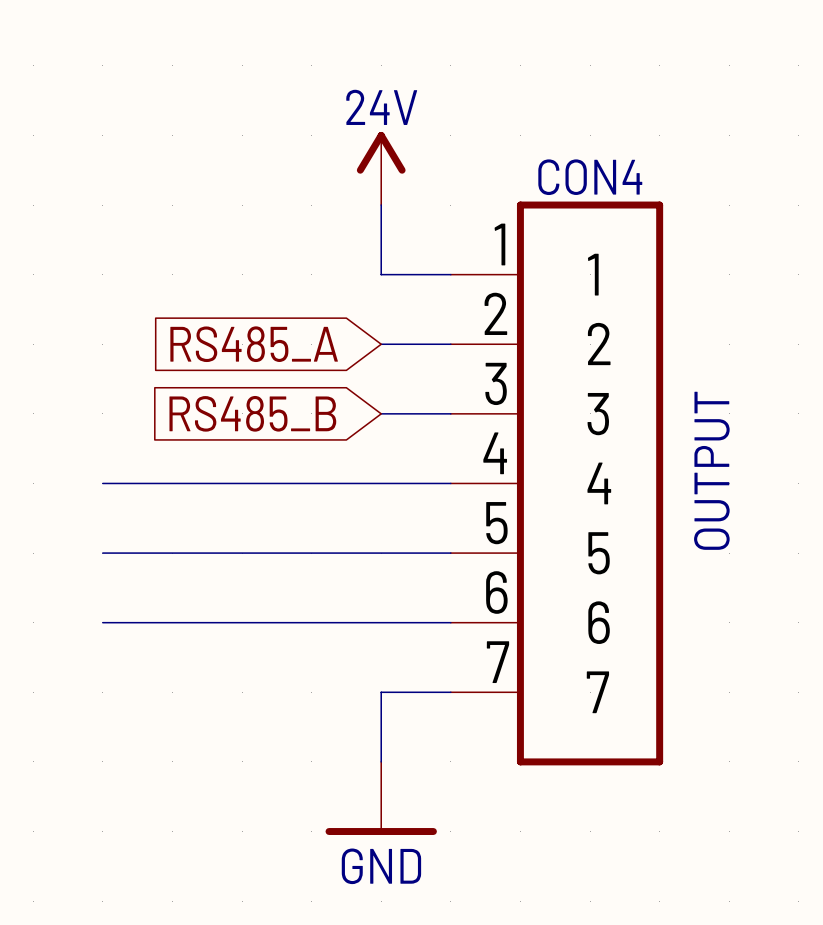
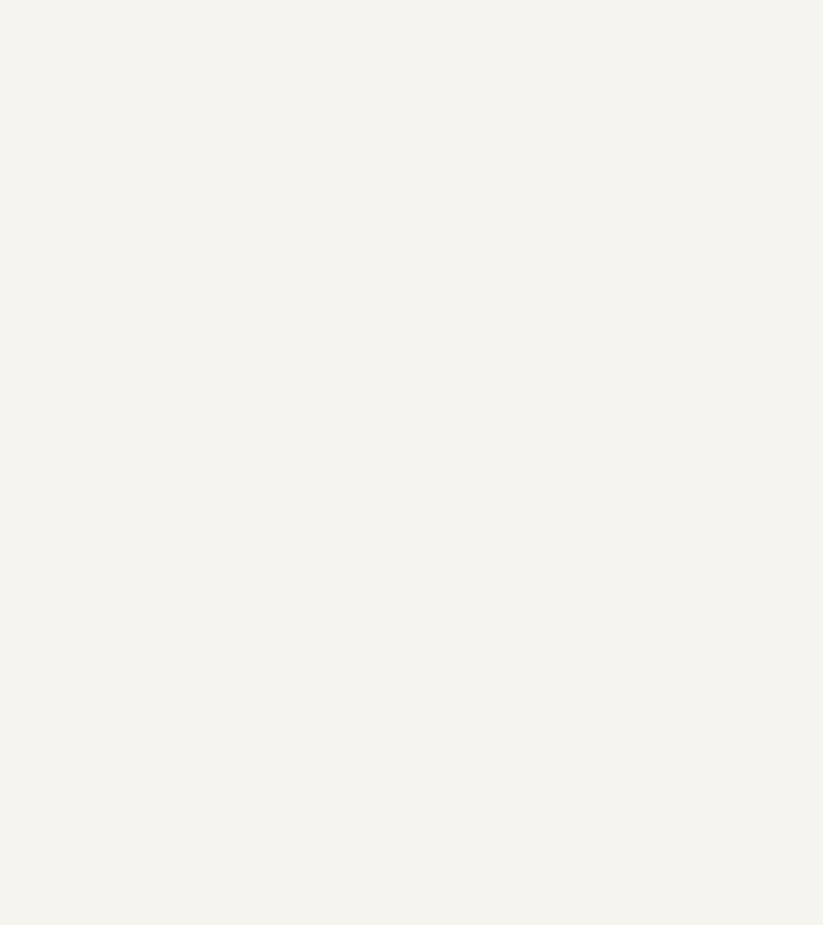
power symbol: 24V (381, 168) -> none
wire: (381, 205) (381, 274) (450, 274) -> none
global label: RS485_A (254, 344) -> none
wire: (381, 344) (450, 344) -> none
global label: RS485_B (252, 413) -> none
wire: (381, 413) (450, 413) -> none
text: OUTPUT (711, 470) -> none
wire: (102, 483) (450, 483) -> none
CON4: (556, 483) -> none
wire: (102, 553) (450, 553) -> none
wire: (102, 622) (450, 622) -> none
wire: (450, 692) (381, 692) (381, 761) -> none
power symbol: GND (381, 798) -> none

